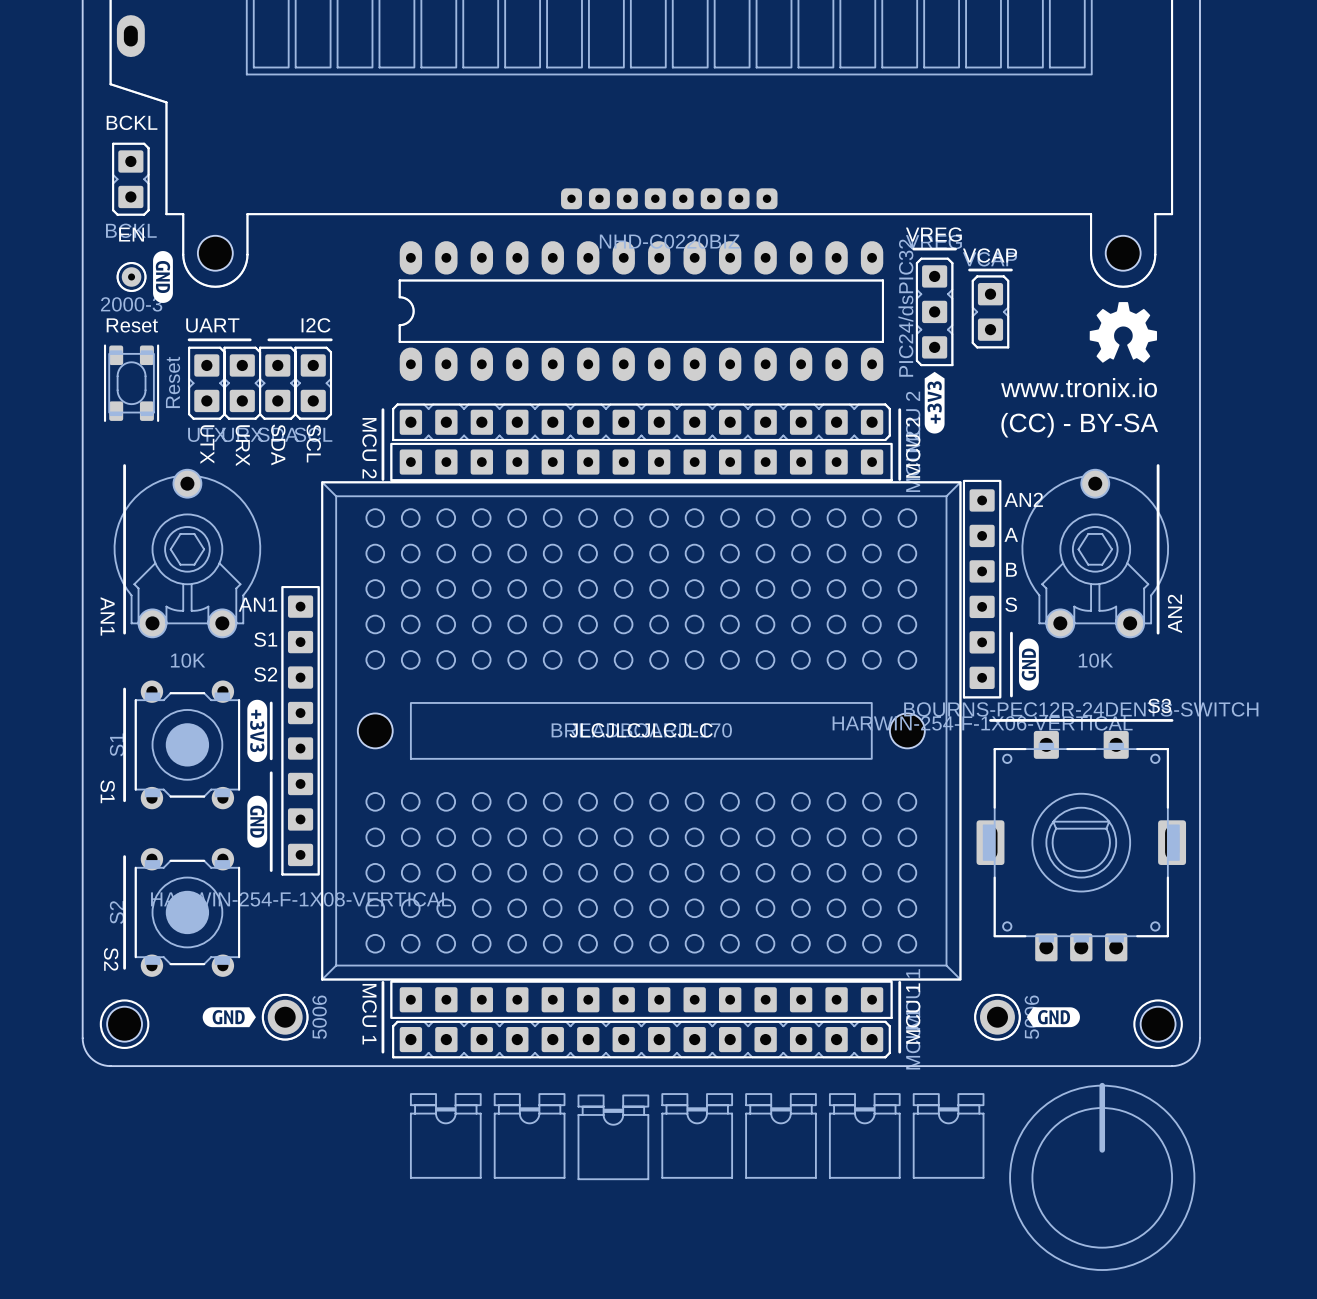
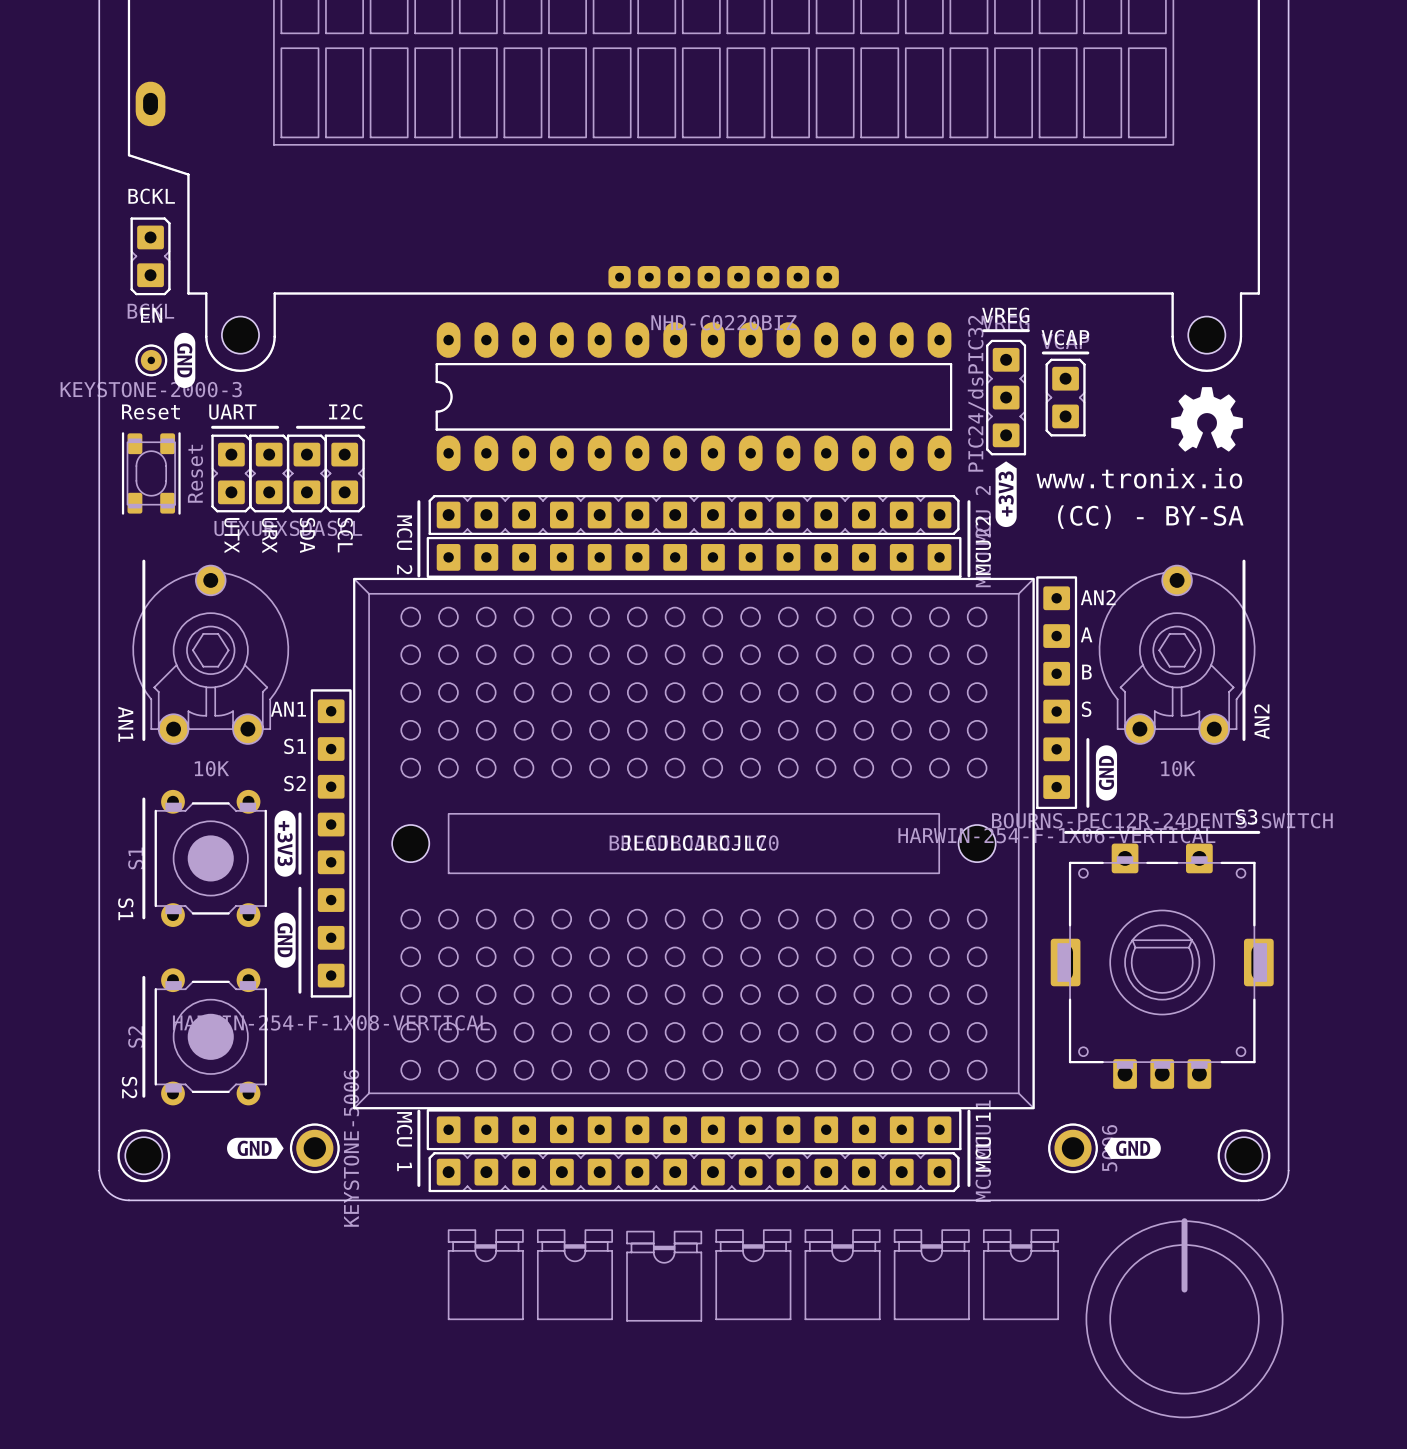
part value: 2000-3 (131, 304) -> KEYSTONE-2000-3 (151, 389)
part value: 5006 (319, 1017) -> KEYSTONE-5006 (351, 1148)

